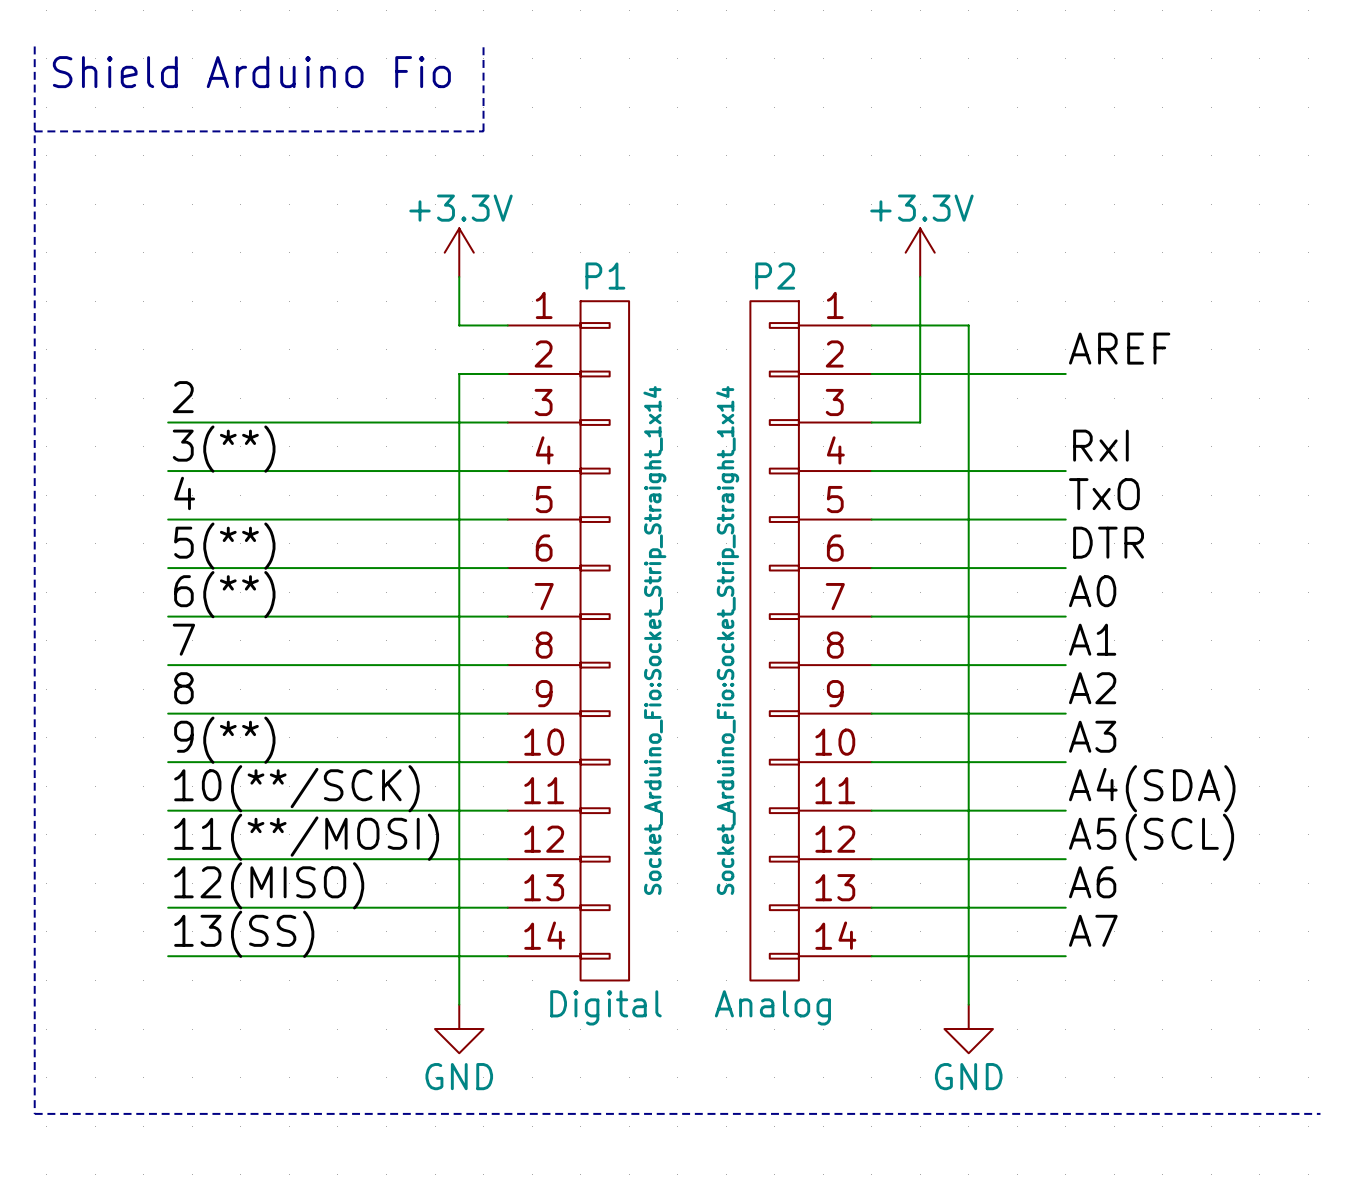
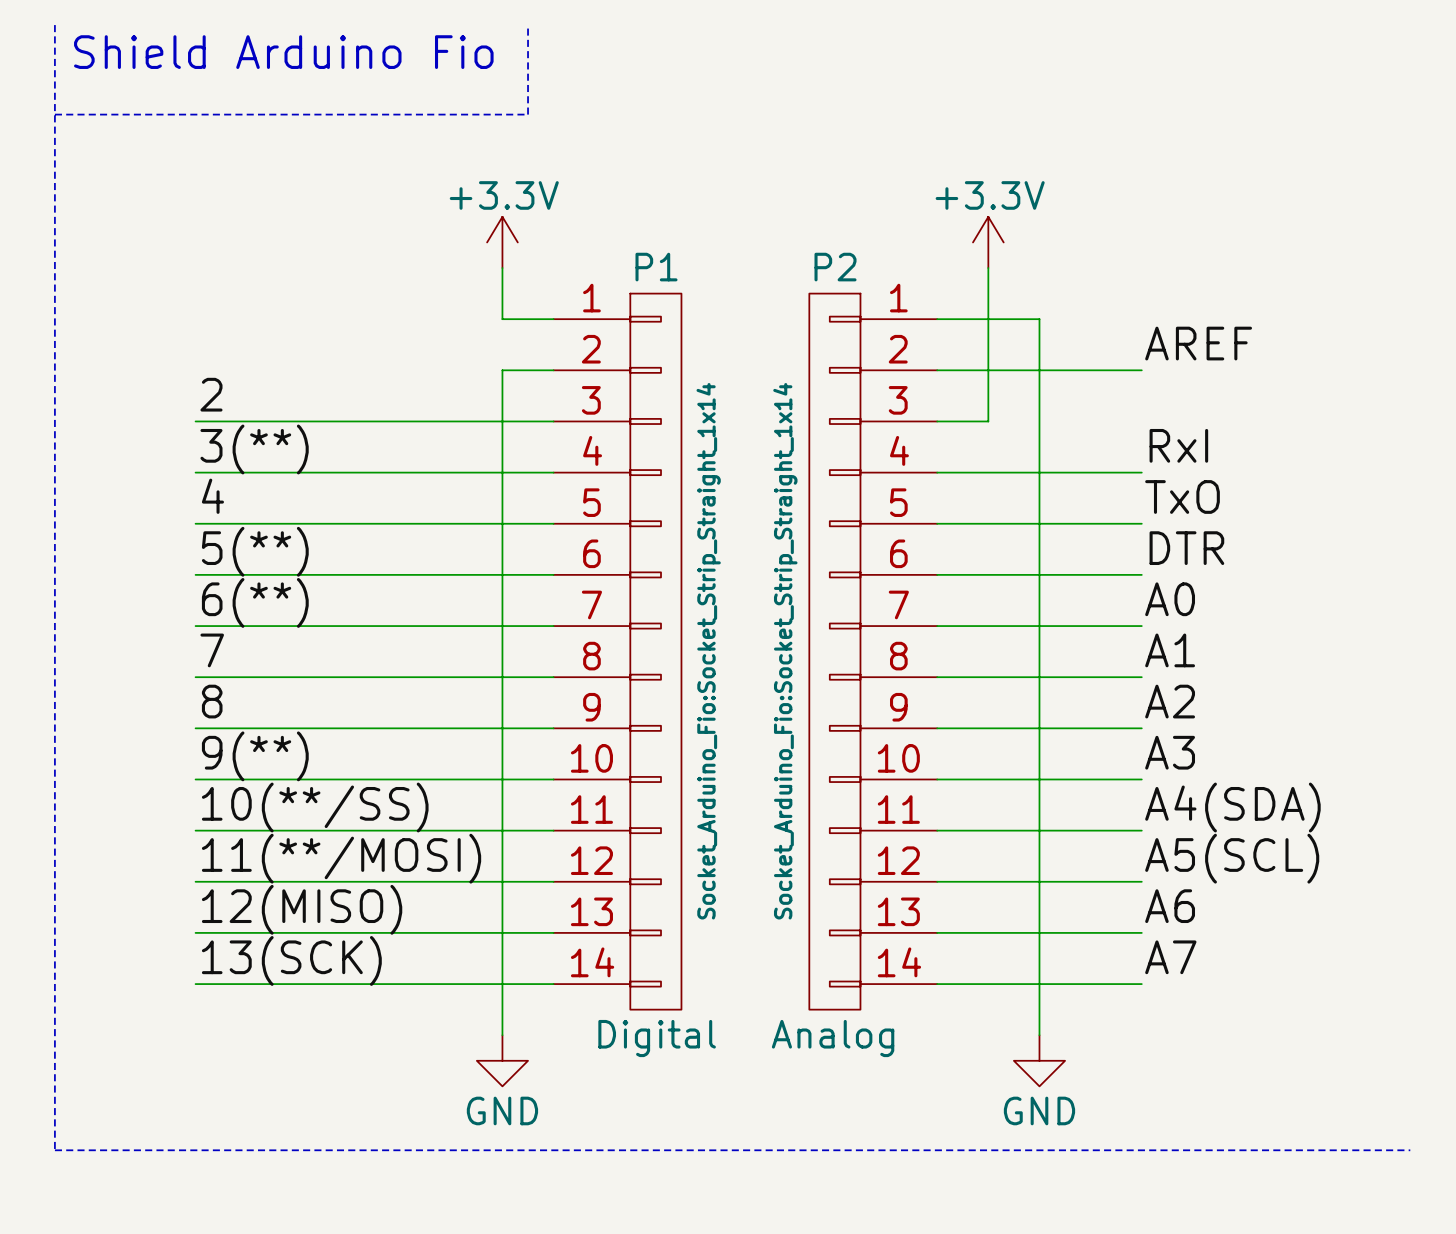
label: 10(**/SCK) (296, 788) -> 10(**/SS) (315, 807)
label: 13(SS) (244, 934) -> 13(SCK) (291, 960)

